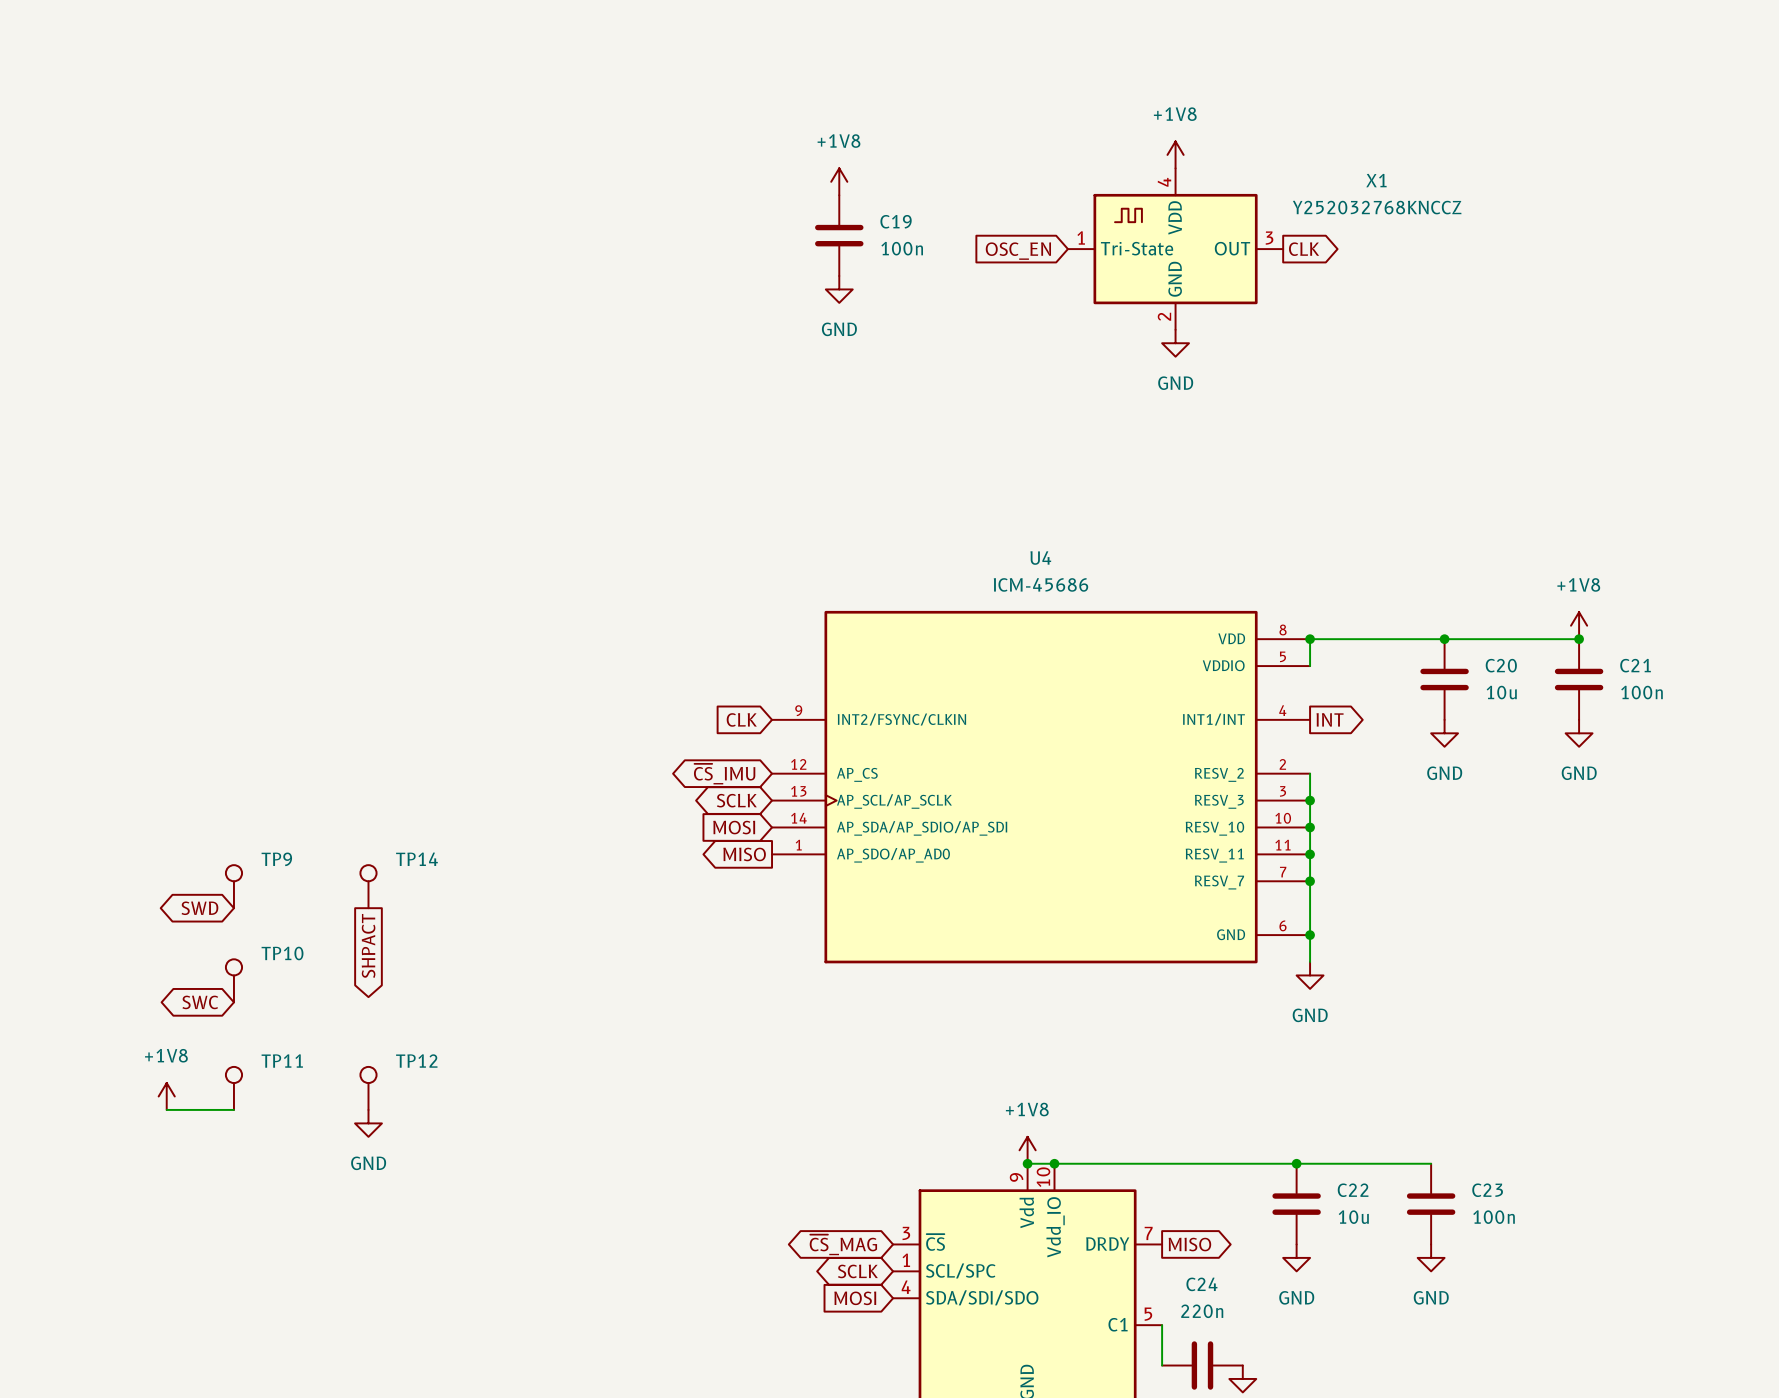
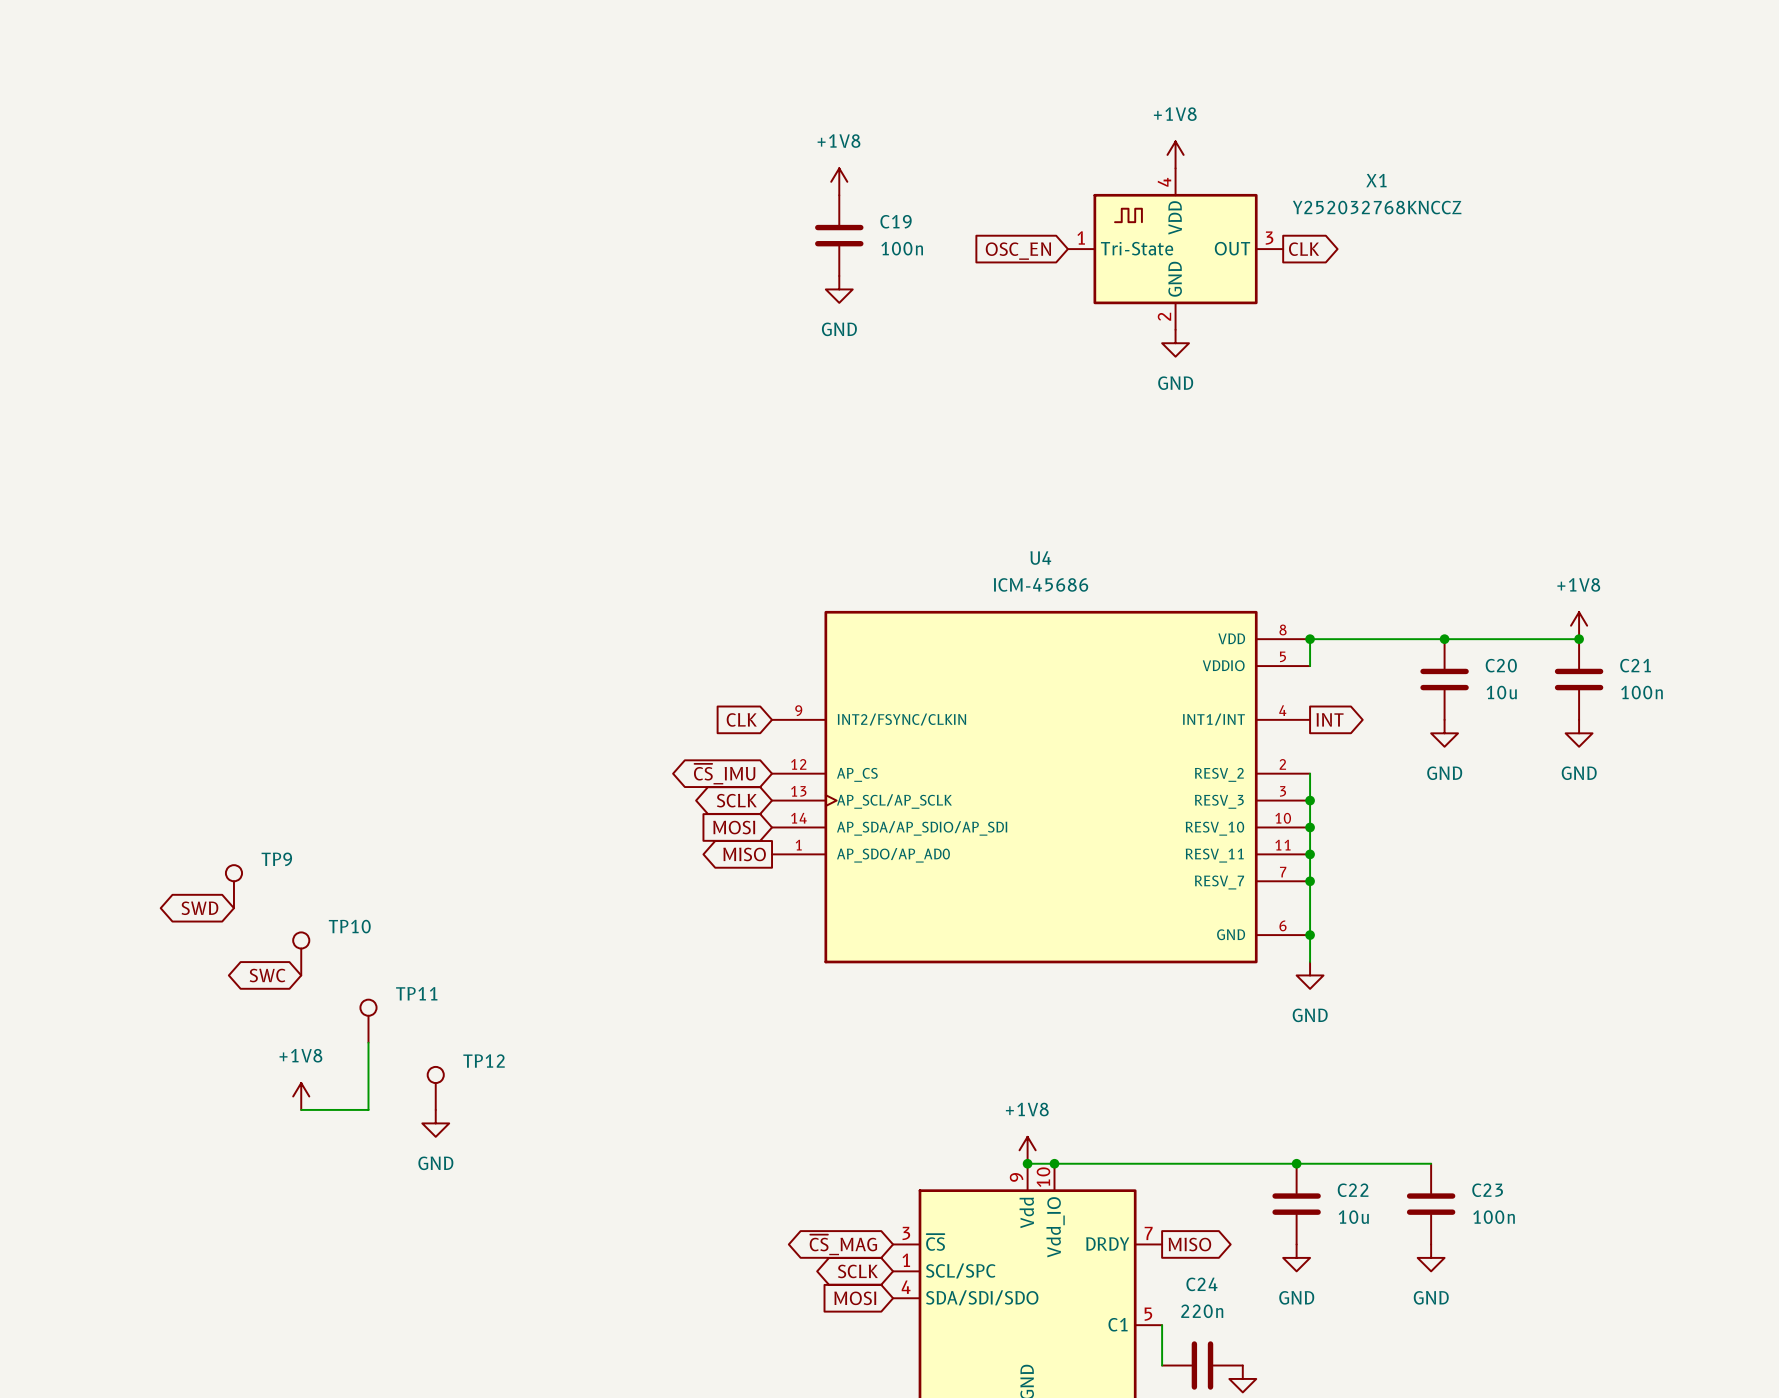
TP14: (368, 886) -> none
global label: SHPACT (368, 945) -> none
TP10 position: (233, 980) -> (301, 953)
global label position: SWC (200, 1002) -> SWC (267, 975)
wire: none -> (368, 1042) (368, 1109) (301, 1109)
TP11 position: (233, 1088) -> (368, 1021)
TP12 position: (368, 1088) -> (435, 1088)
power symbol position: +1V8 (166, 1096) -> +1V8 (301, 1096)
wire: (166, 1109) (233, 1109) -> none
power symbol position: GND (368, 1123) -> GND (435, 1123)

